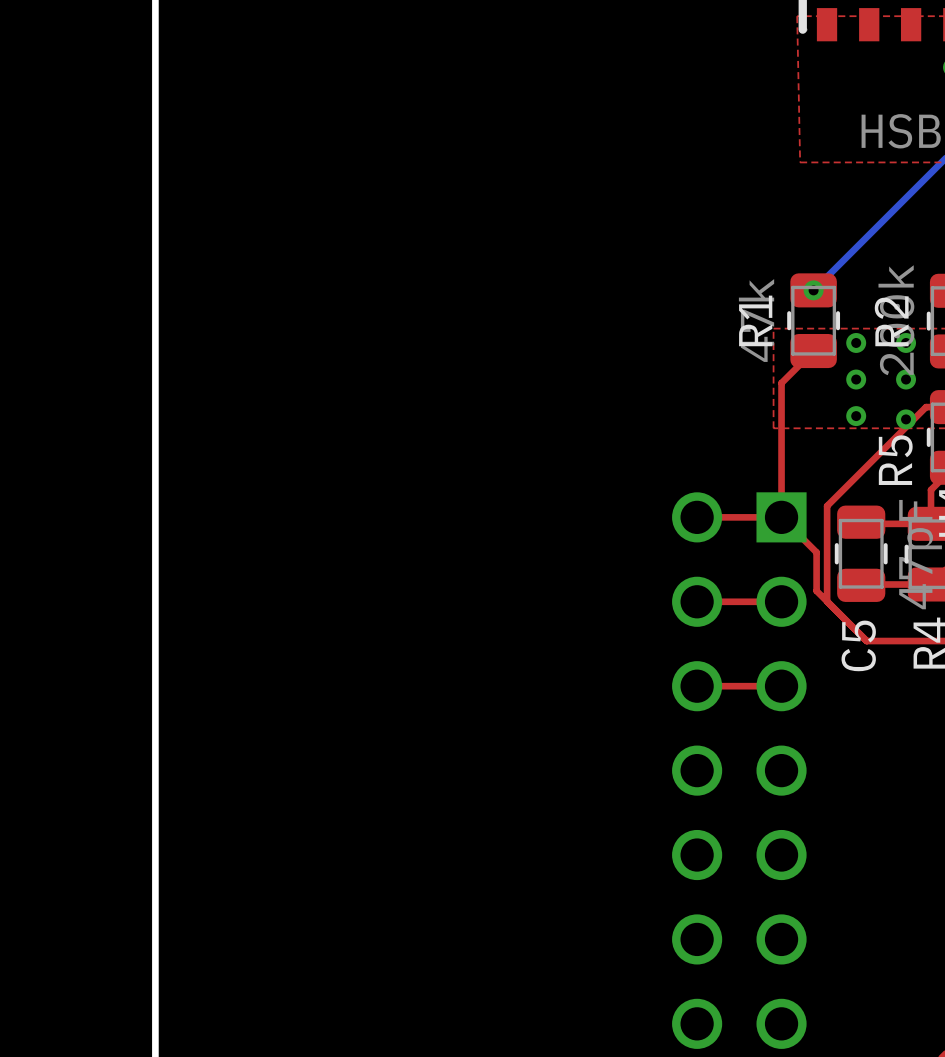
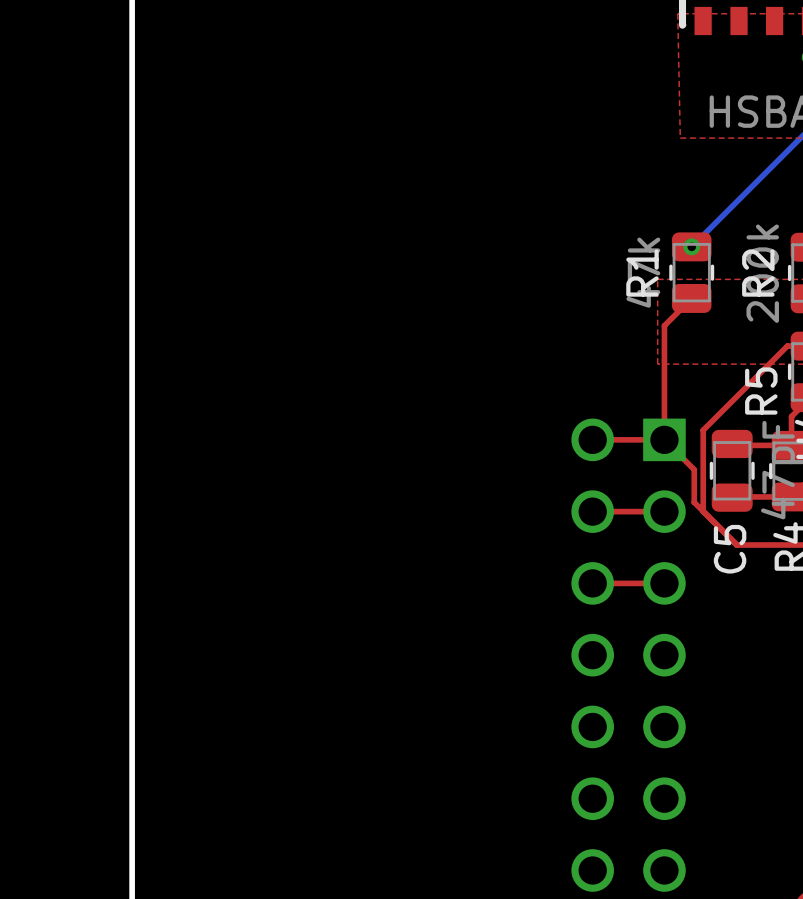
via: (856, 342) -> none
via: (906, 342) -> none
via: (856, 379) -> none
via: (906, 379) -> none
via: (856, 416) -> none
via: (906, 419) -> none

